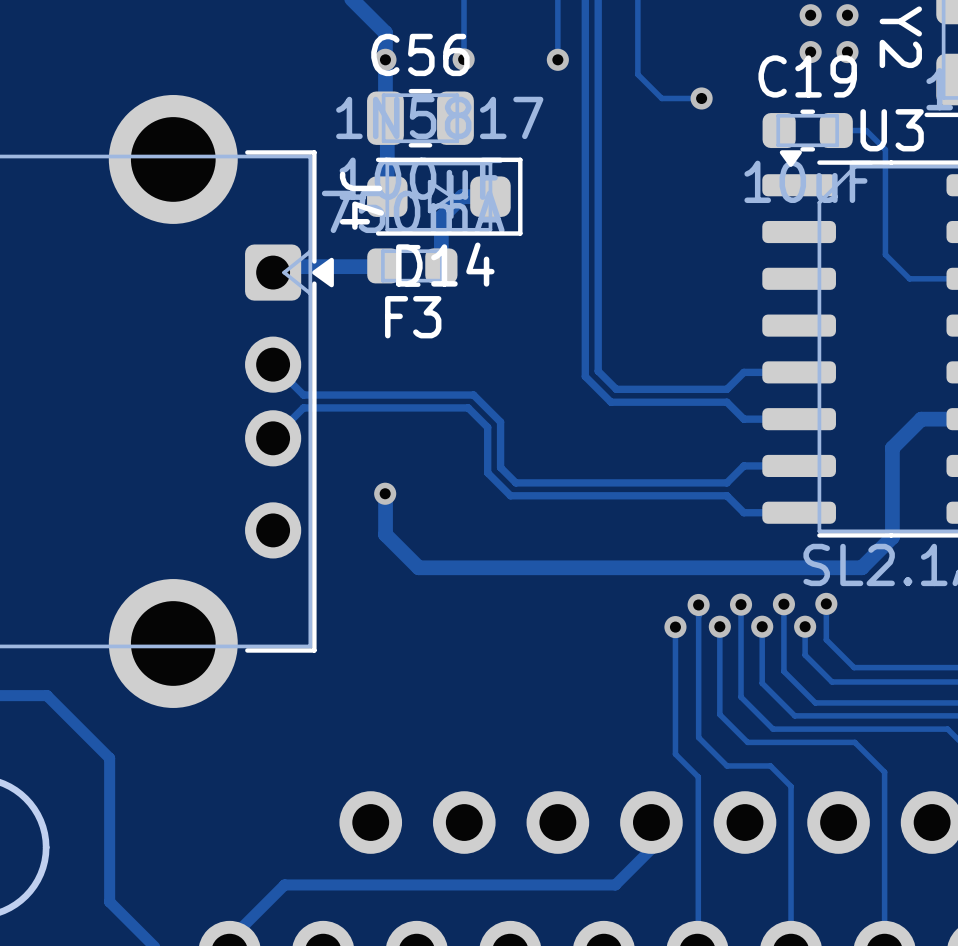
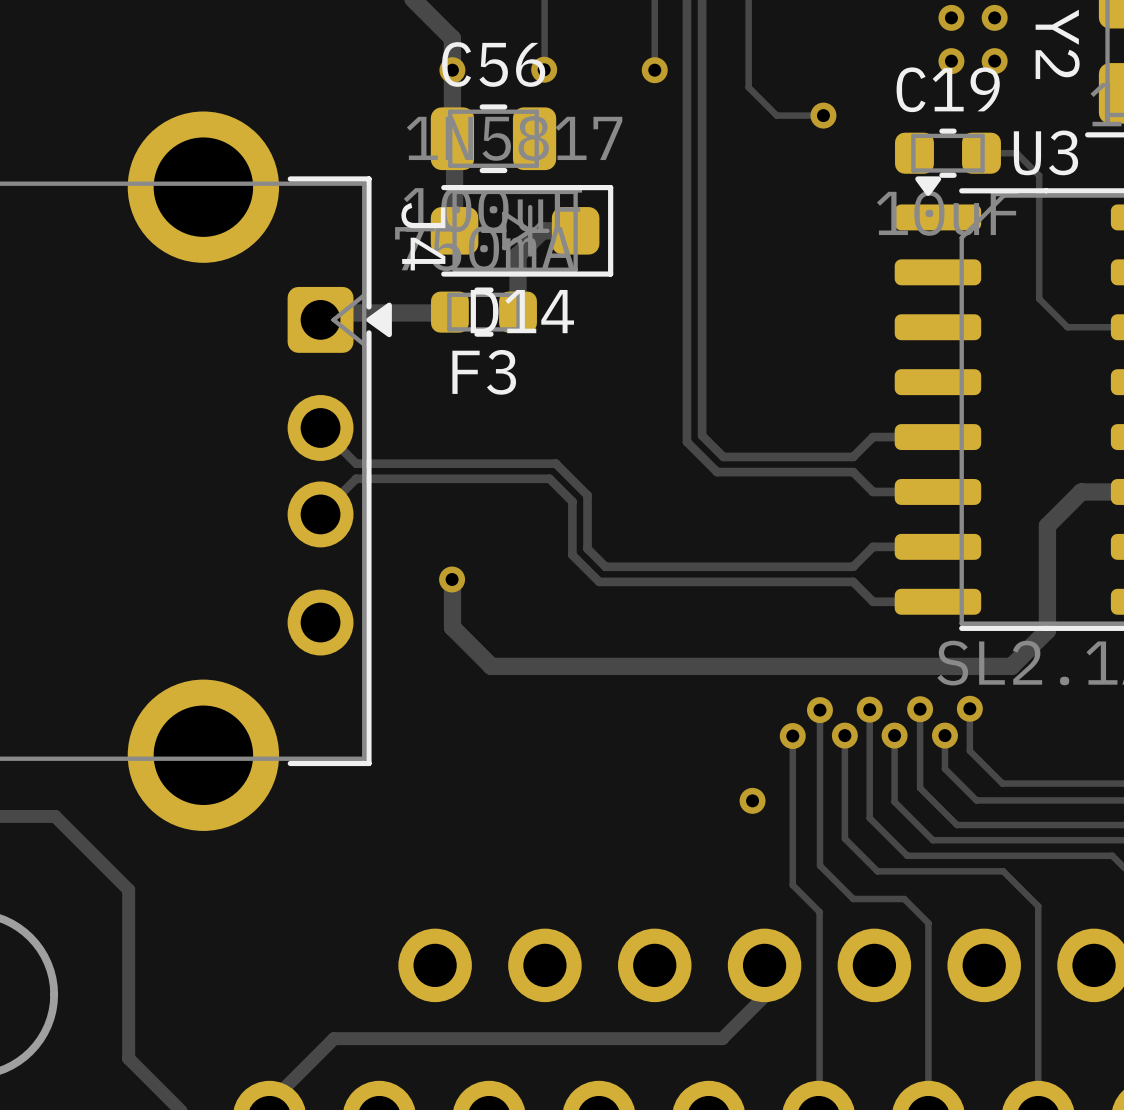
via: none -> (752, 800)

